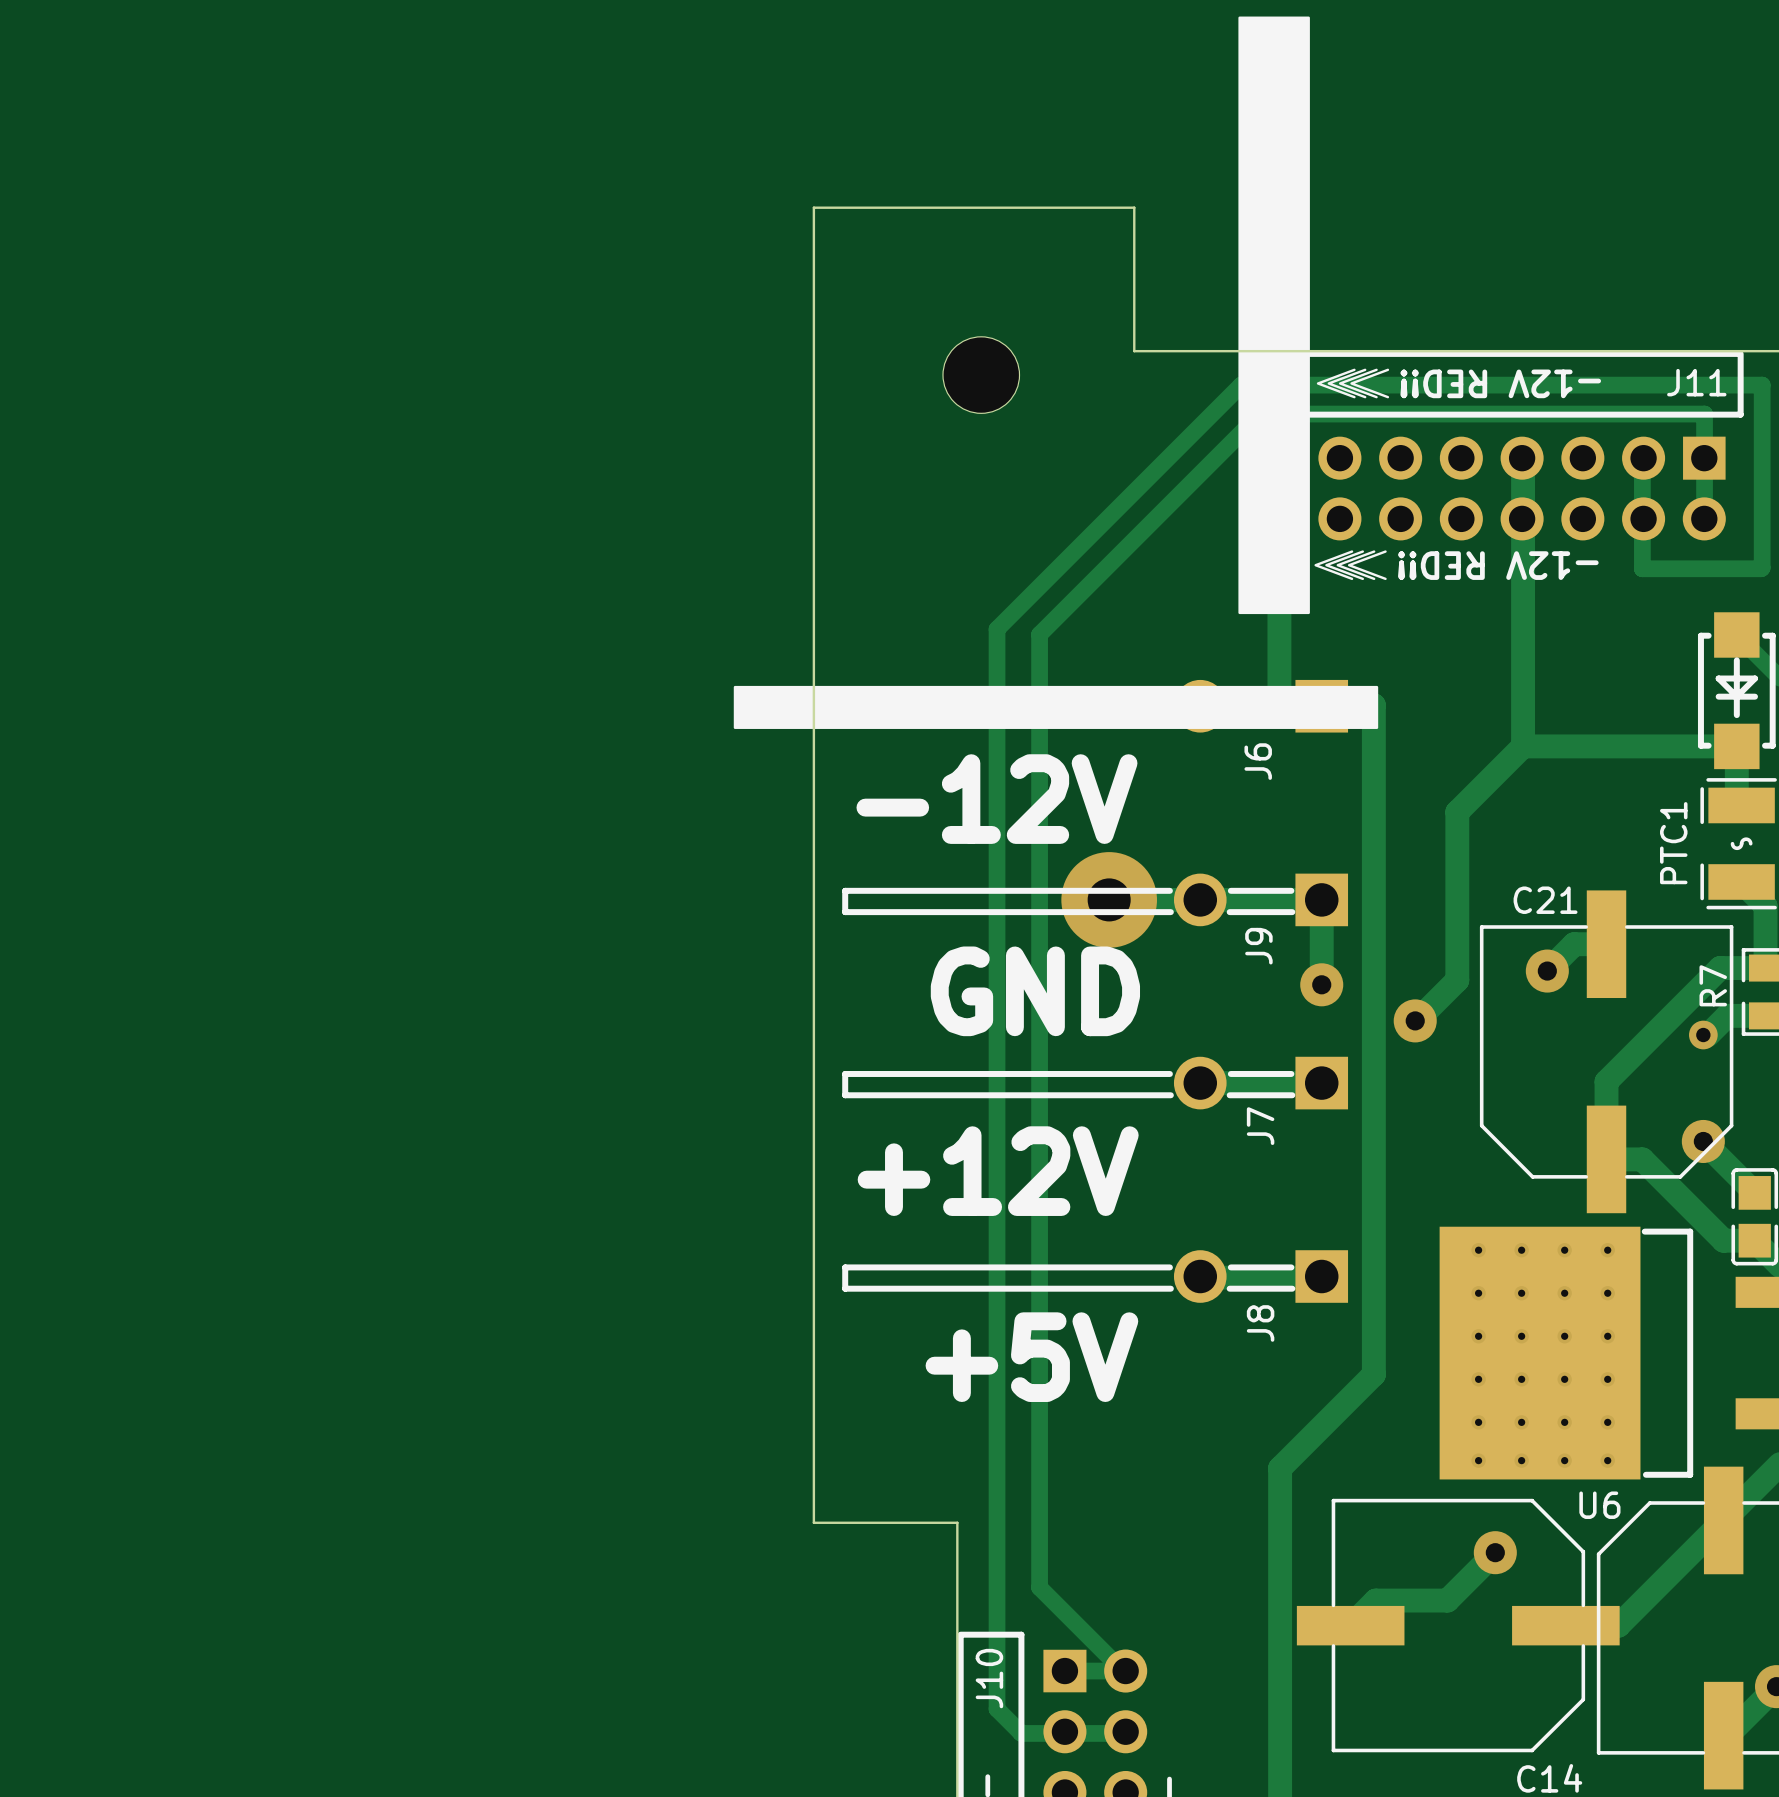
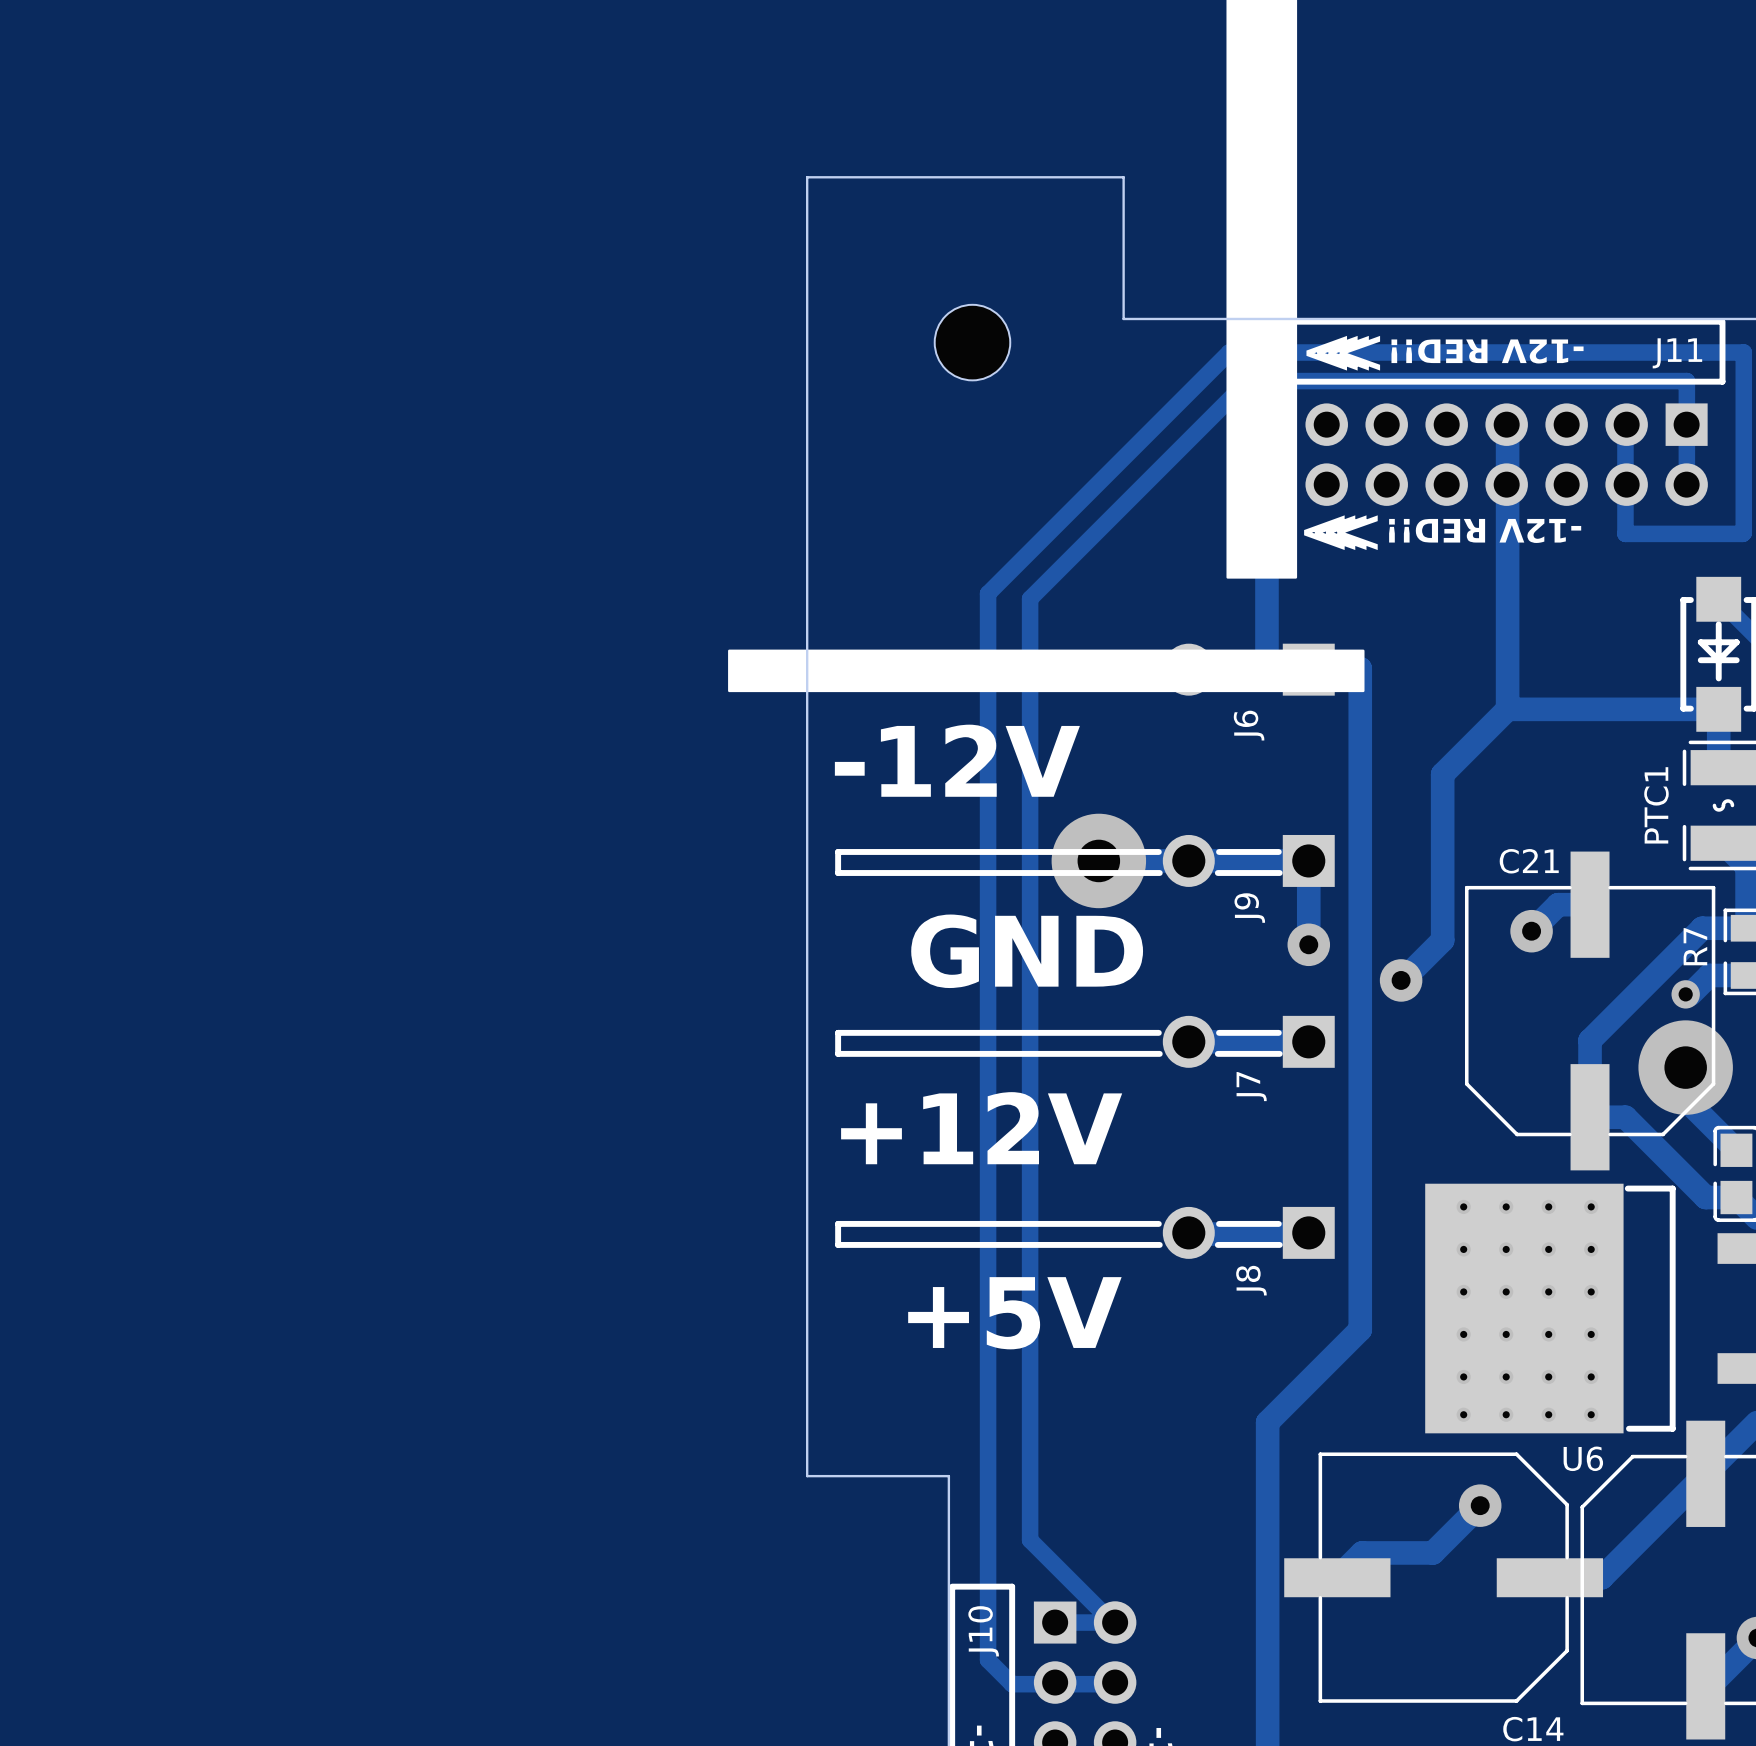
via: none -> (1685, 1067)
via: (1703, 1141) -> none

